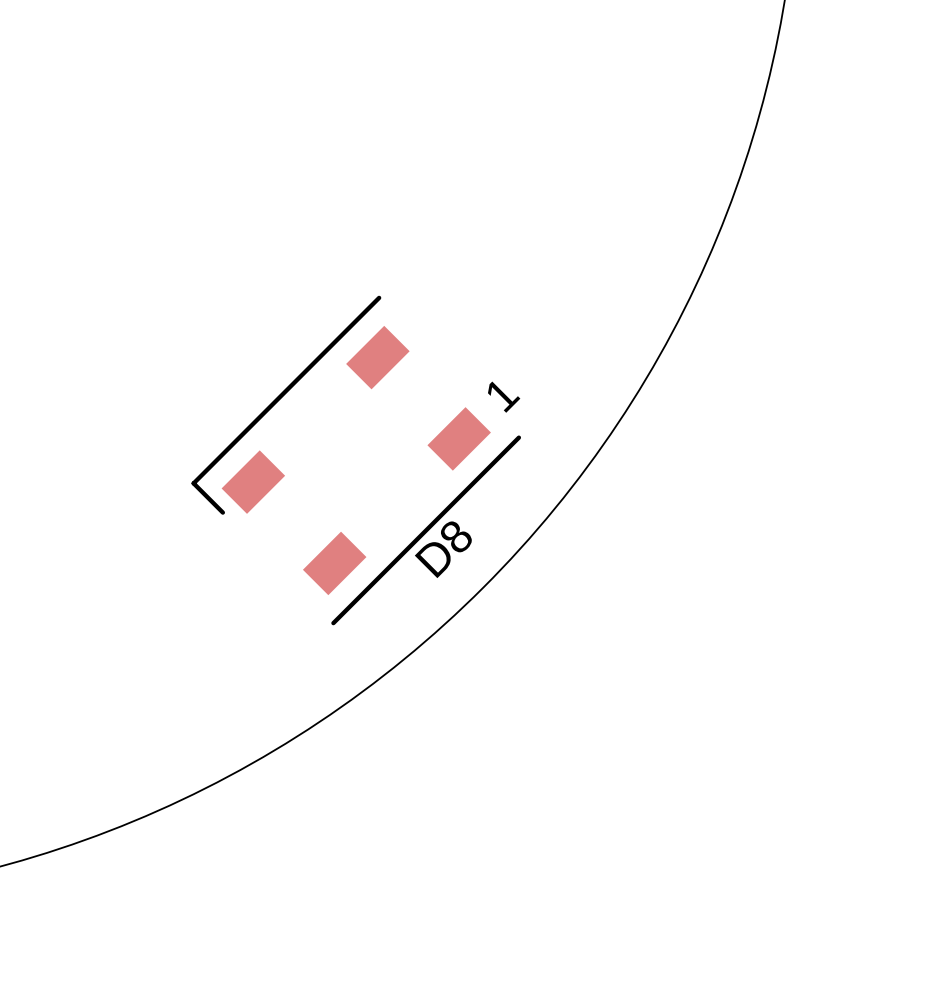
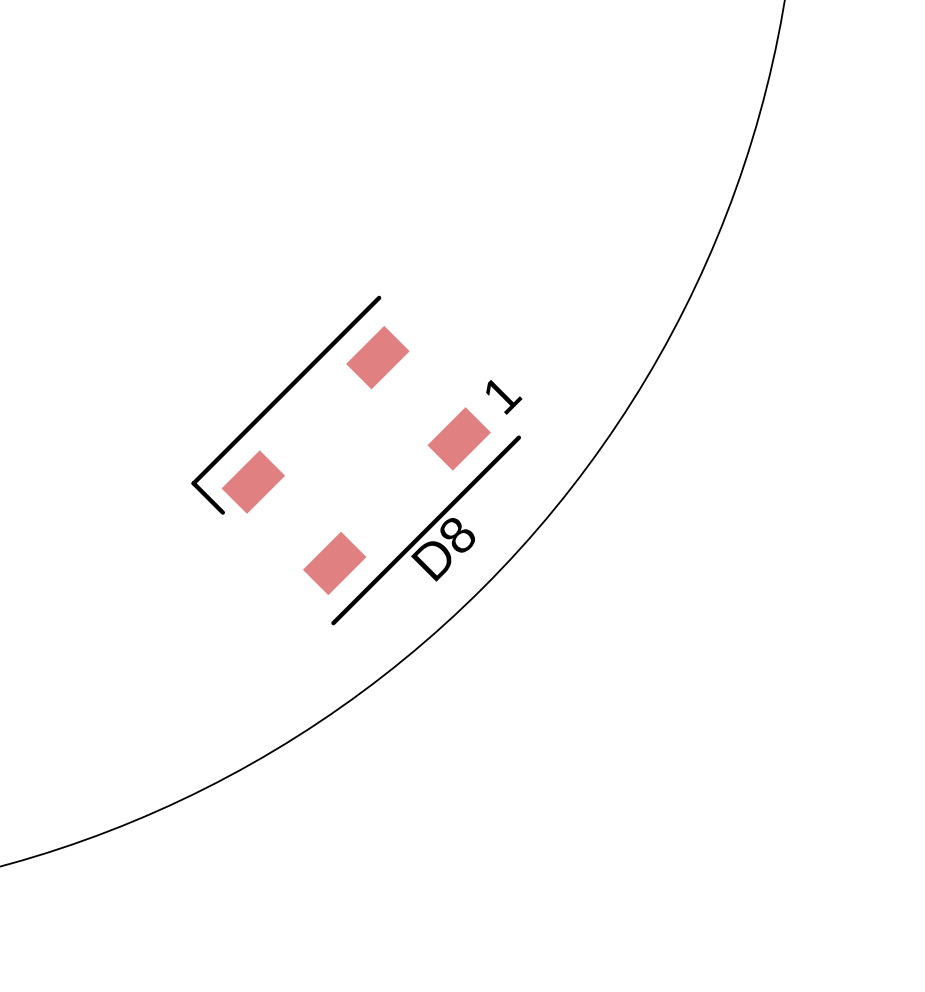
D8 footprint: [191, 295, 522, 626] -> [191, 295, 522, 626]

